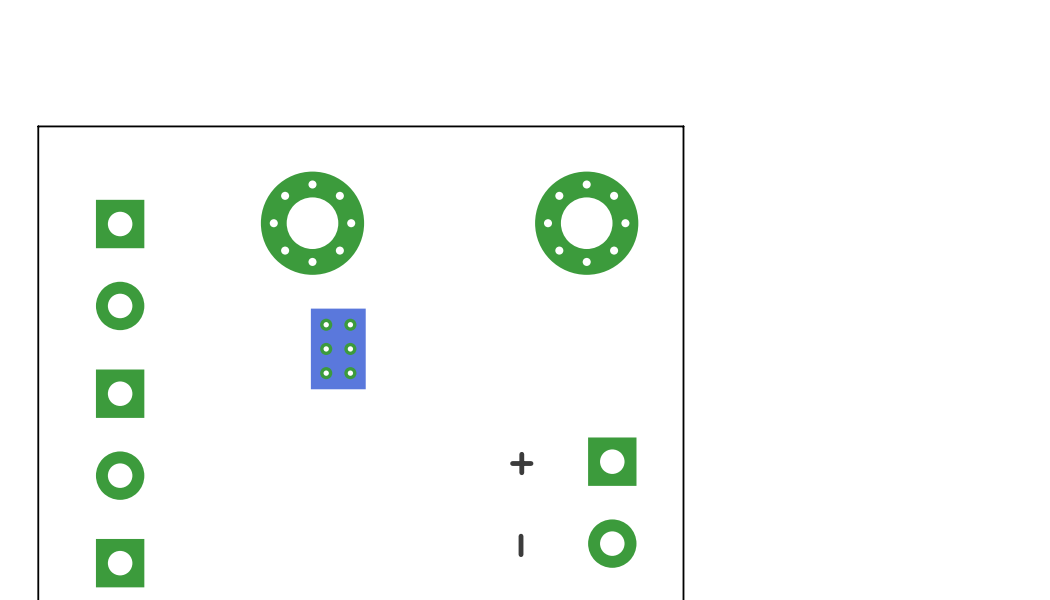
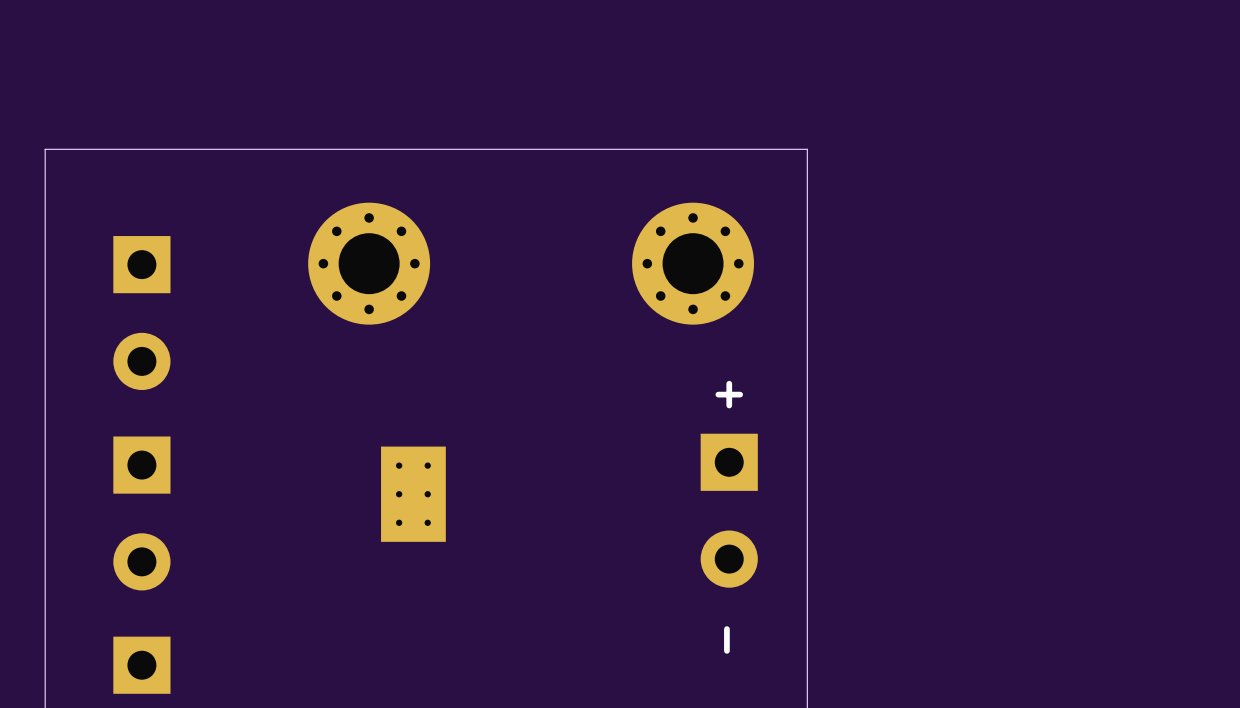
part position: (338, 348) -> (413, 494)
text position: + (521, 463) -> + (729, 394)
part position: (612, 502) -> (729, 510)
text position: - (521, 545) -> - (726, 639)

